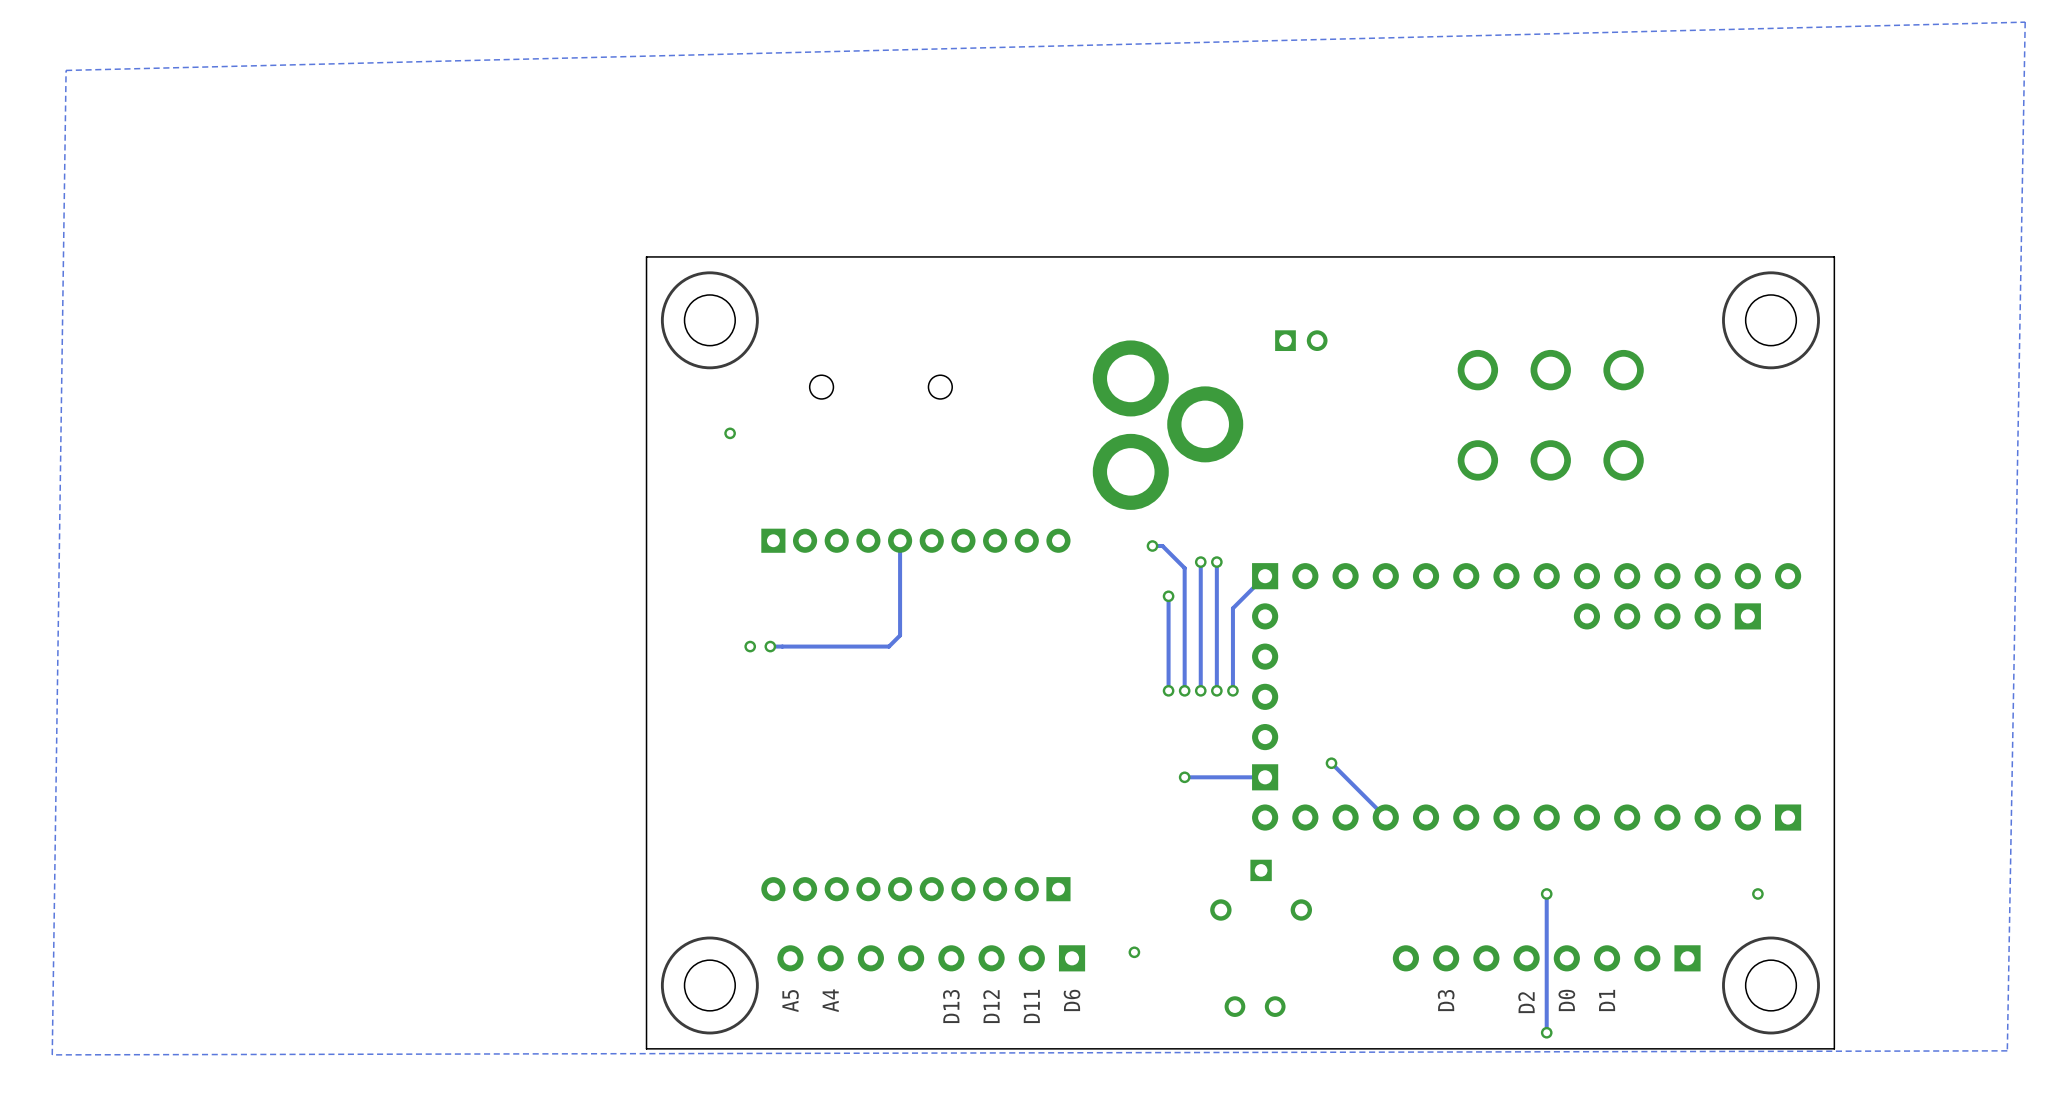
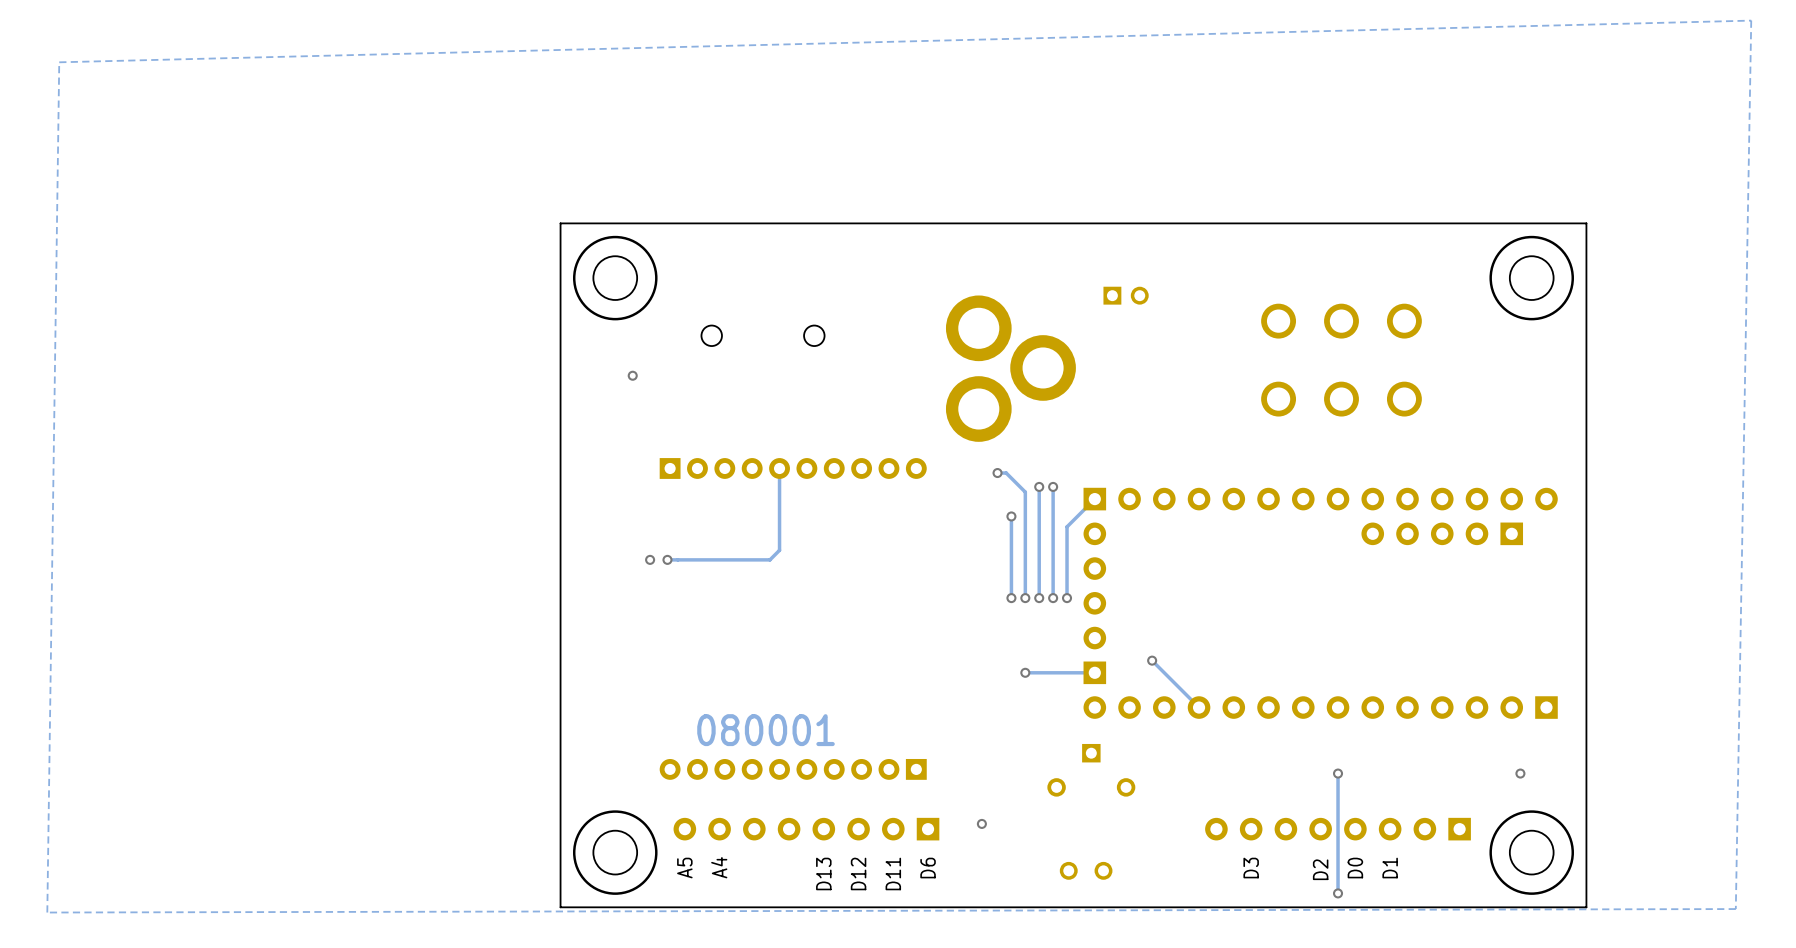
text: none -> 080001 (766, 730)

